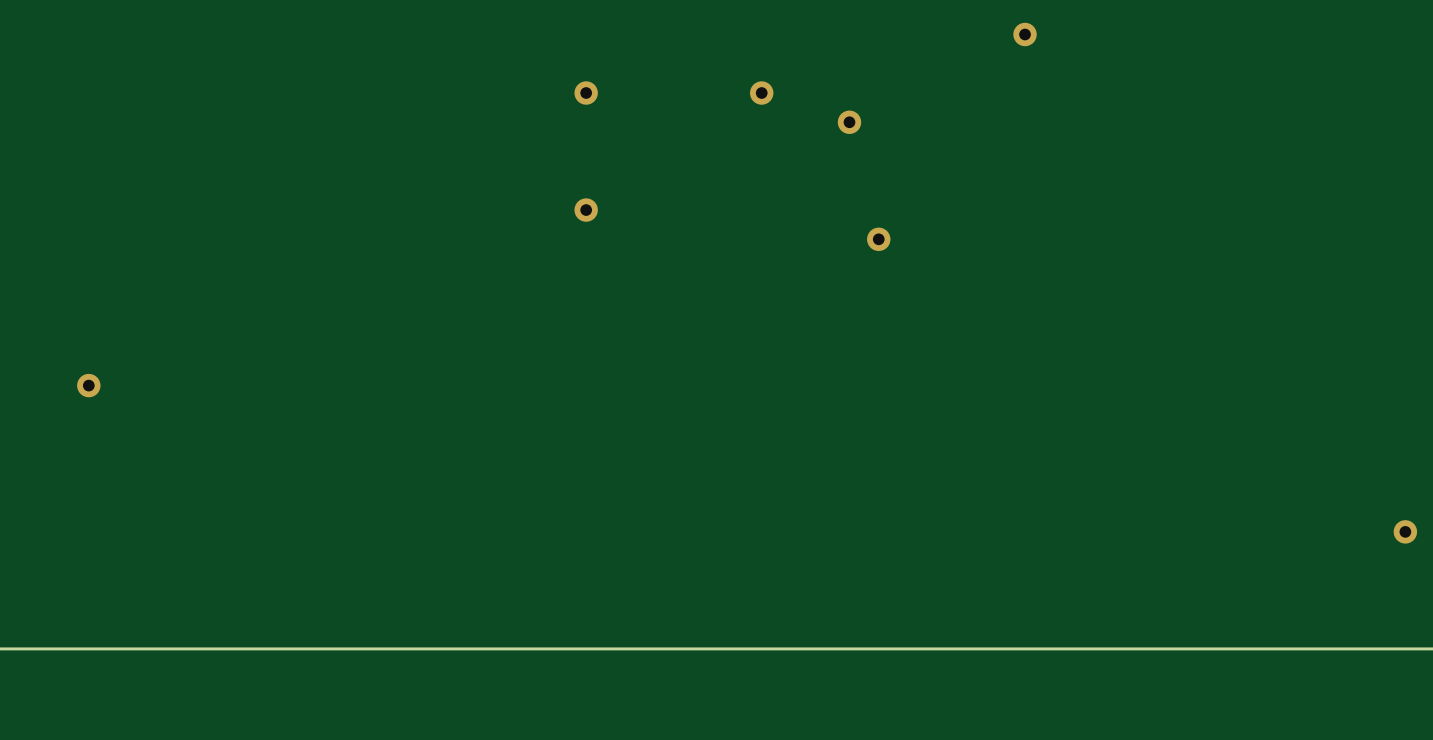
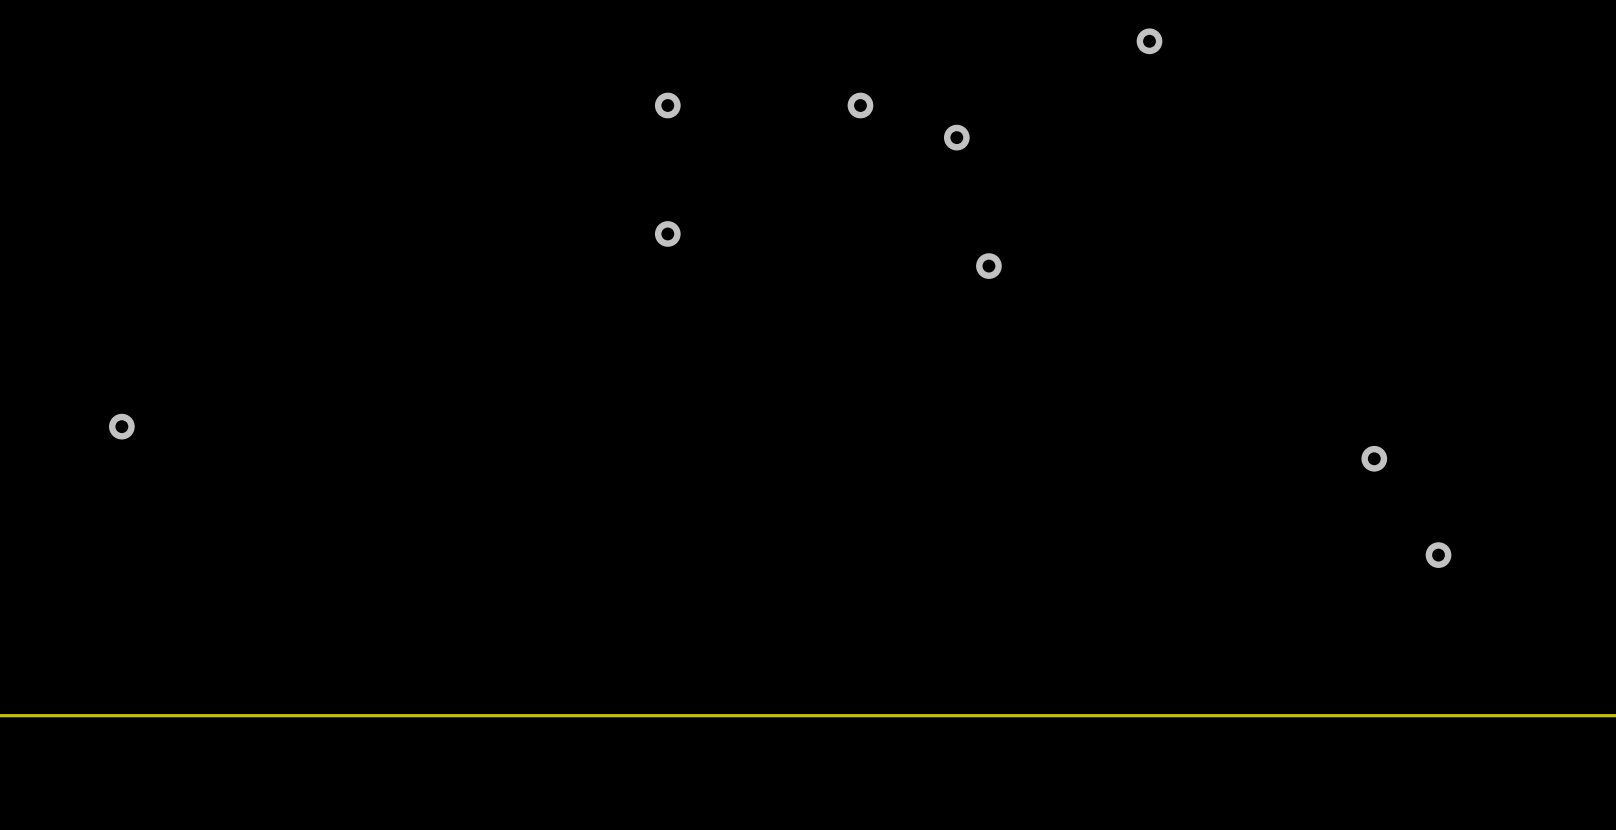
via: none -> (1374, 458)
via: none -> (1438, 555)
via: (1405, 531) -> none

